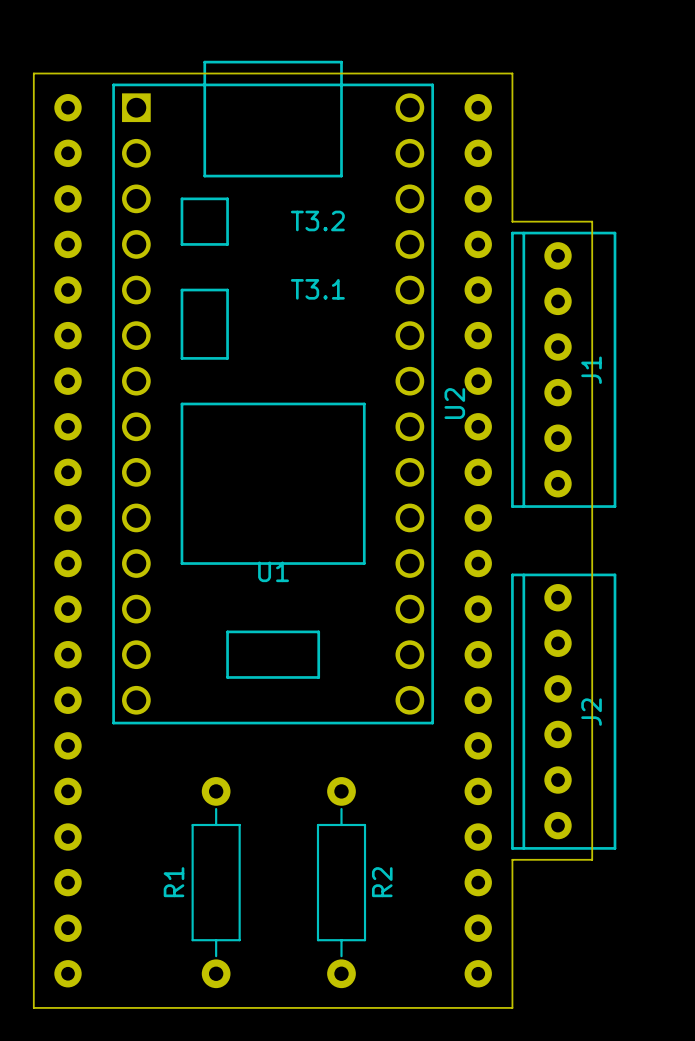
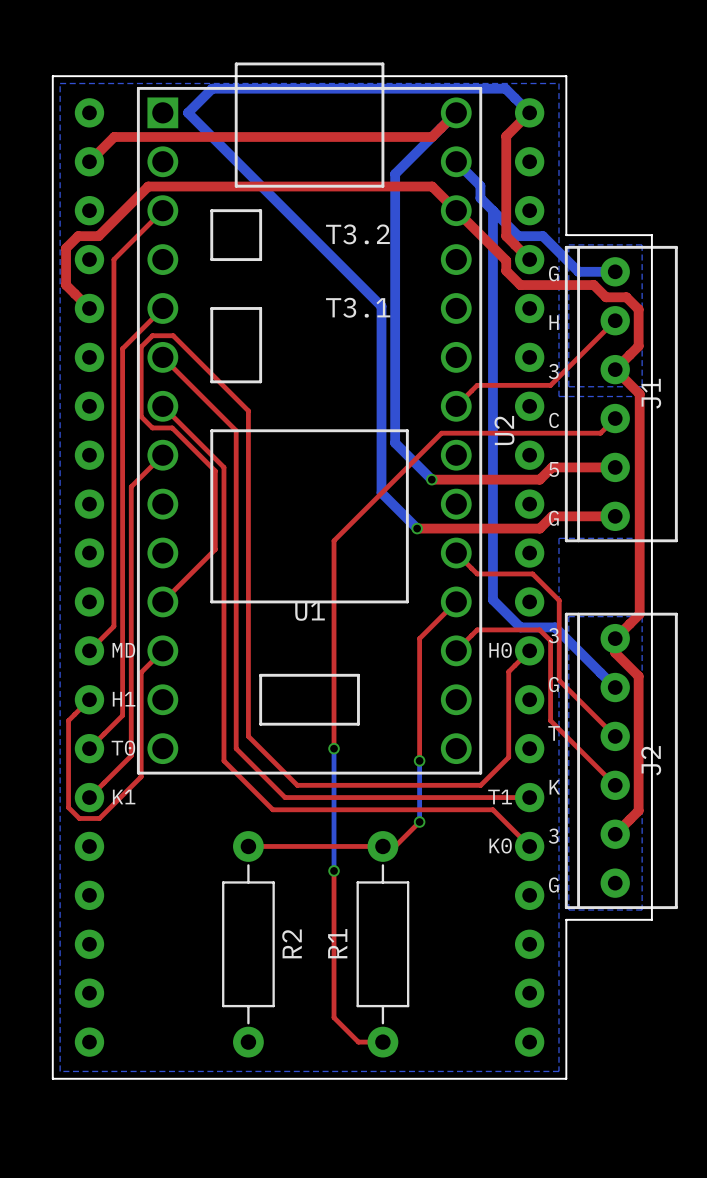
bottom zone outline: none -> (60, 83) (60, 1071) (558, 1071) (558, 538) (642, 538) (642, 396) (558, 396) (558, 83) (60, 83)
top track: none -> (456, 112) (432, 137) (114, 137) (89, 161)
bottom track: none -> (456, 112) (395, 173) (395, 442) (431, 479)
top track: none -> (529, 112) (506, 136) (506, 236) (529, 259)
bottom track: none -> (529, 112) (505, 88) (212, 88) (188, 112) (381, 306) (381, 492) (417, 528)
bottom track: none -> (456, 161) (480, 185) (480, 198) (518, 236) (542, 236) (578, 271) (615, 271)
top track: none -> (162, 210) (113, 259) (113, 626) (89, 650)
bottom track: none -> (492, 210) (492, 599) (520, 627) (555, 627) (615, 687)
bottom zone outline: none -> (568, 244) (568, 386) (642, 386) (642, 244) (568, 244)
text: none -> G (553, 273)
top track: none -> (89, 308) (66, 285) (66, 248) (78, 236) (98, 236) (148, 186) (432, 186) (506, 260) (506, 270) (520, 285) (593, 285) (606, 297) (626, 297) (638, 309) (638, 346) (615, 369) (639, 394) (639, 614) (615, 638) (615, 652) (638, 676) (638, 810) (615, 834)
top track: none -> (162, 308) (122, 348) (122, 715) (89, 748)
top track: none -> (615, 320) (550, 385) (477, 385) (456, 406)
text: none -> H (554, 322)
top track: none -> (162, 357) (236, 430) (236, 748) (285, 797) (529, 797)
text: none -> 3 (553, 371)
top track: none -> (162, 406) (223, 467) (223, 760) (272, 809) (492, 809) (529, 846)
top track: none -> (615, 418) (600, 433) (441, 433) (334, 540) (334, 748)
text: none -> C (554, 420)
top track: none -> (162, 455) (131, 486) (131, 755) (89, 797)
top track: none -> (615, 467) (552, 467) (539, 479) (431, 479)
text: none -> 5 (554, 469)
via: none -> (431, 479)
top track: none -> (615, 516) (552, 516) (539, 528) (417, 528)
text: none -> G (553, 518)
via: none -> (417, 528)
top track: none -> (456, 553) (477, 573) (532, 573) (559, 600) (559, 680) (615, 736)
top track: none -> (162, 601) (215, 549) (215, 471) (172, 427) (152, 427) (141, 416) (141, 346) (152, 335) (173, 335) (248, 410) (248, 736) (297, 785) (480, 785) (508, 757) (508, 671) (529, 650)
top track: none -> (456, 601) (419, 638) (419, 760)
bottom zone outline: none -> (568, 616) (568, 910) (642, 910) (642, 616) (568, 616)
text: none -> 3 (553, 635)
text: none -> MD (123, 650)
text: none -> H0 (500, 650)
top track: none -> (162, 650) (141, 672) (141, 776) (99, 818) (79, 818) (68, 807) (68, 720) (89, 699)
top track: none -> (456, 650) (477, 629) (539, 629) (550, 640) (550, 720) (615, 785)
text: none -> G (553, 684)
text: none -> H1 (124, 699)
text: none -> T (554, 733)
text: none -> T0 (123, 748)
bottom track: none -> (334, 748) (334, 870)
via: none -> (334, 748)
bottom track: none -> (419, 760) (419, 822)
via: none -> (419, 760)
text: none -> K (554, 787)
text: none -> K1 (124, 797)
text: none -> T1 (500, 797)
top track: none -> (419, 822) (395, 846) (248, 846)
via: none -> (419, 822)
text: none -> 3 (553, 836)
text: none -> K0 (500, 845)
top track: none -> (334, 870) (334, 1017) (358, 1042) (382, 1042)
via: none -> (334, 870)
text: none -> G (553, 885)
R1 name: R1 (174, 882) -> R2 (292, 943)
R2 name: R2 (382, 882) -> R1 (337, 943)

